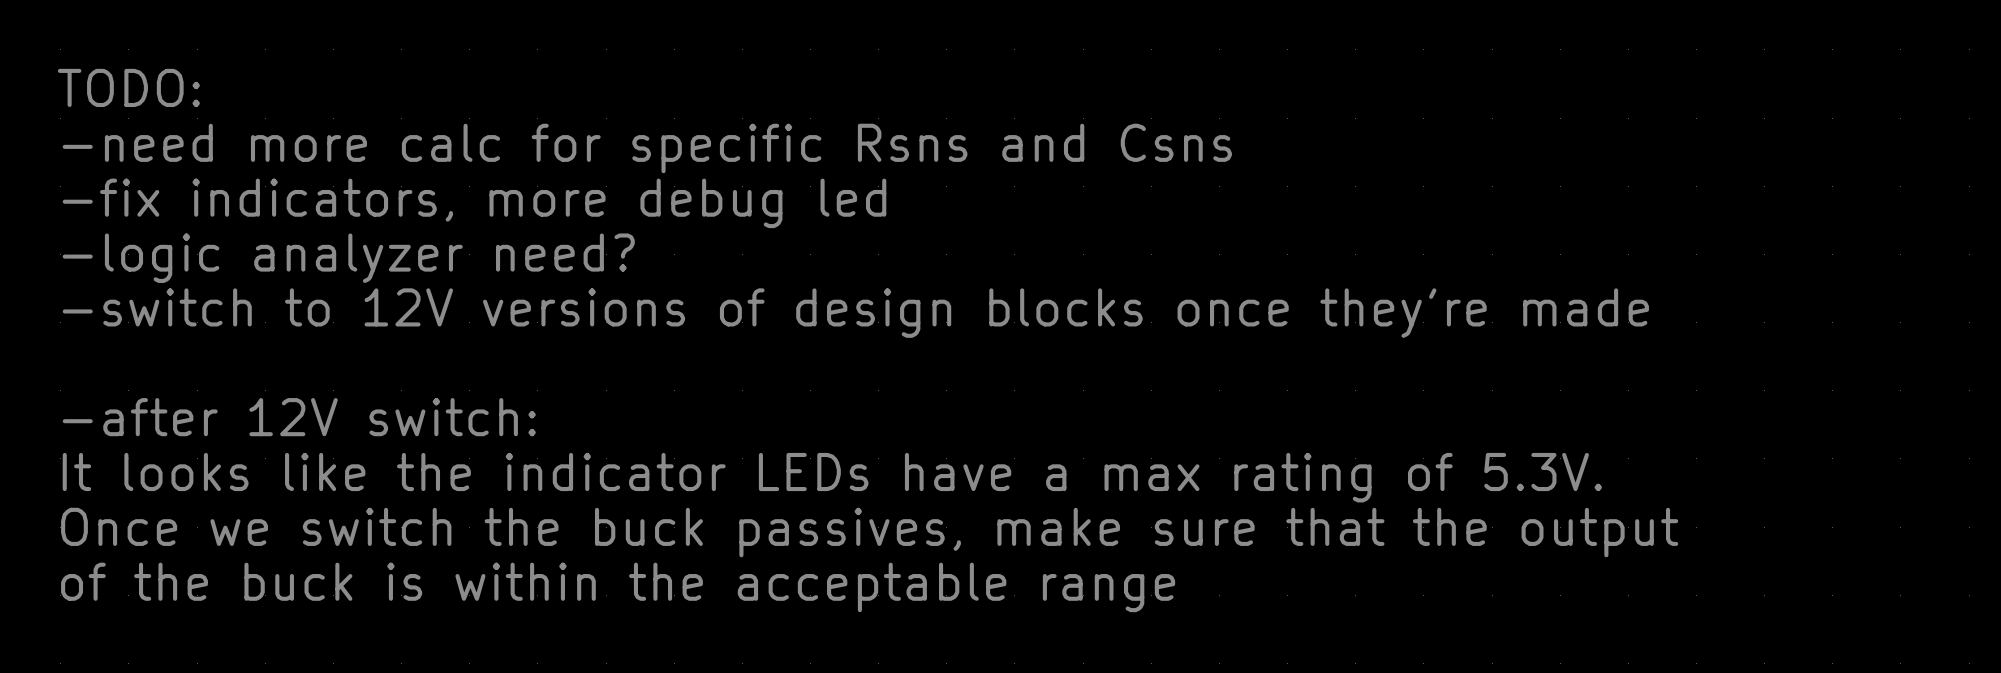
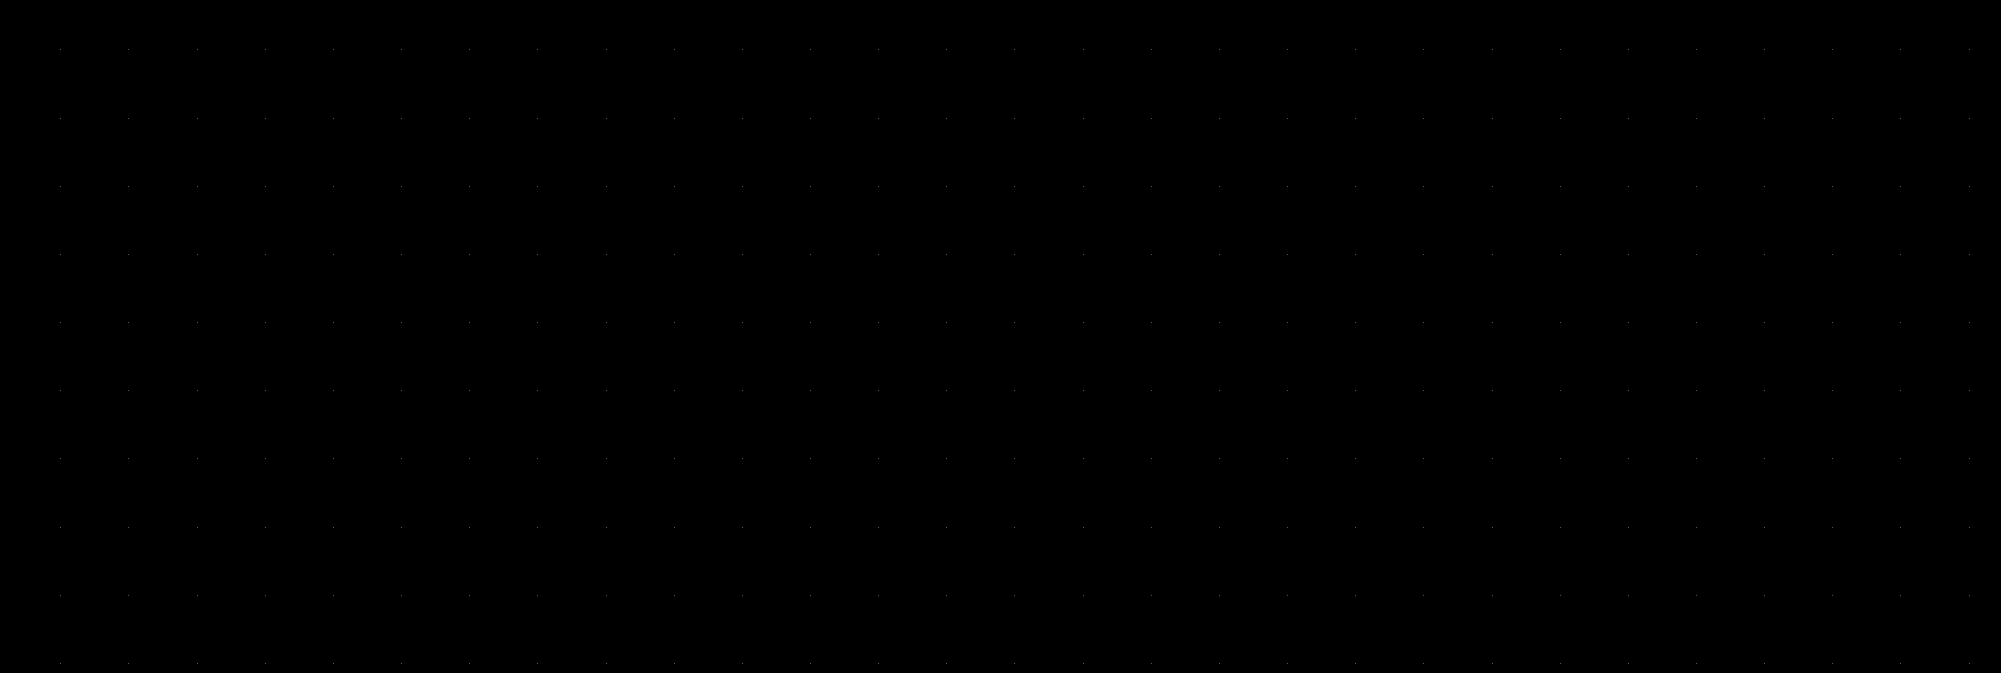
text: TODO: (128, 87) -> none
text: -need more calc for specific Rsns and Csns (647, 148) -> none
text: -fix indicators, more debug led (474, 203) -> none
text: -logic analyzer need? (348, 258) -> none
text: -switch to 12V versions of design blocks once they're made (855, 313) -> none
text: -after 12V switch: (299, 417) -> none
text: It looks like the indicator LEDs have a max rating of 5.3V. (832, 477) -> none
text: Once we switch the buck passives, make sure that the output (869, 532) -> none
text: of the buck is within the acceptable range (618, 587) -> none

